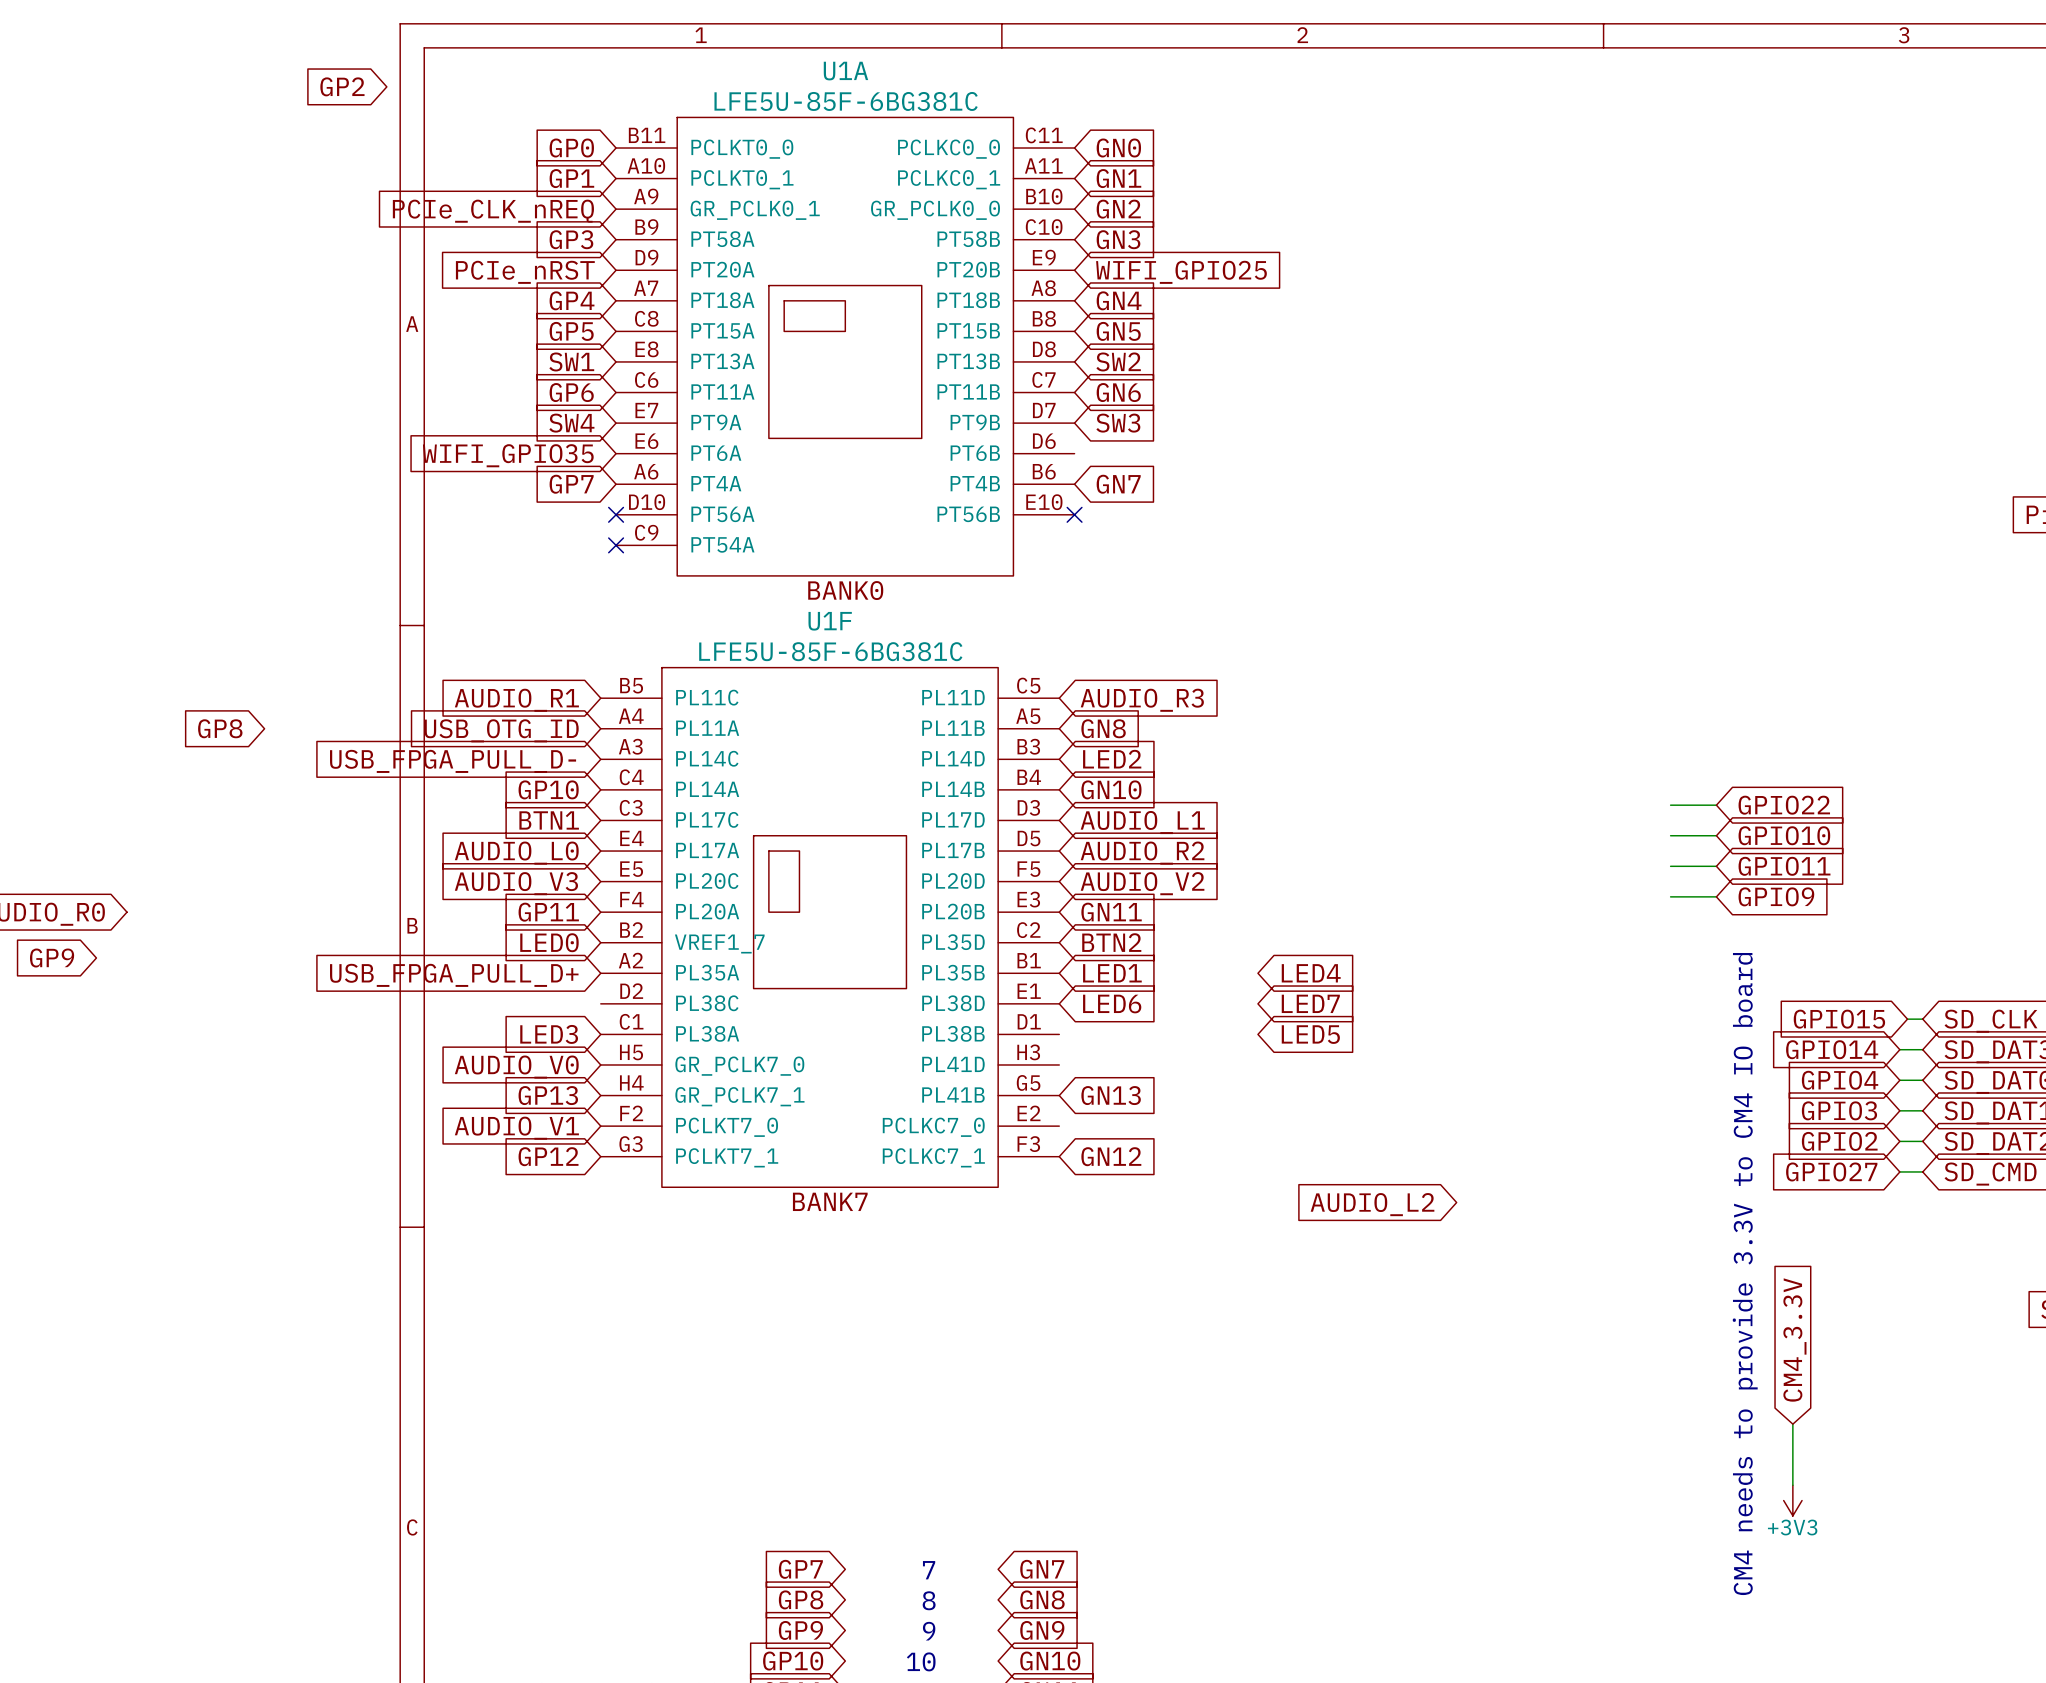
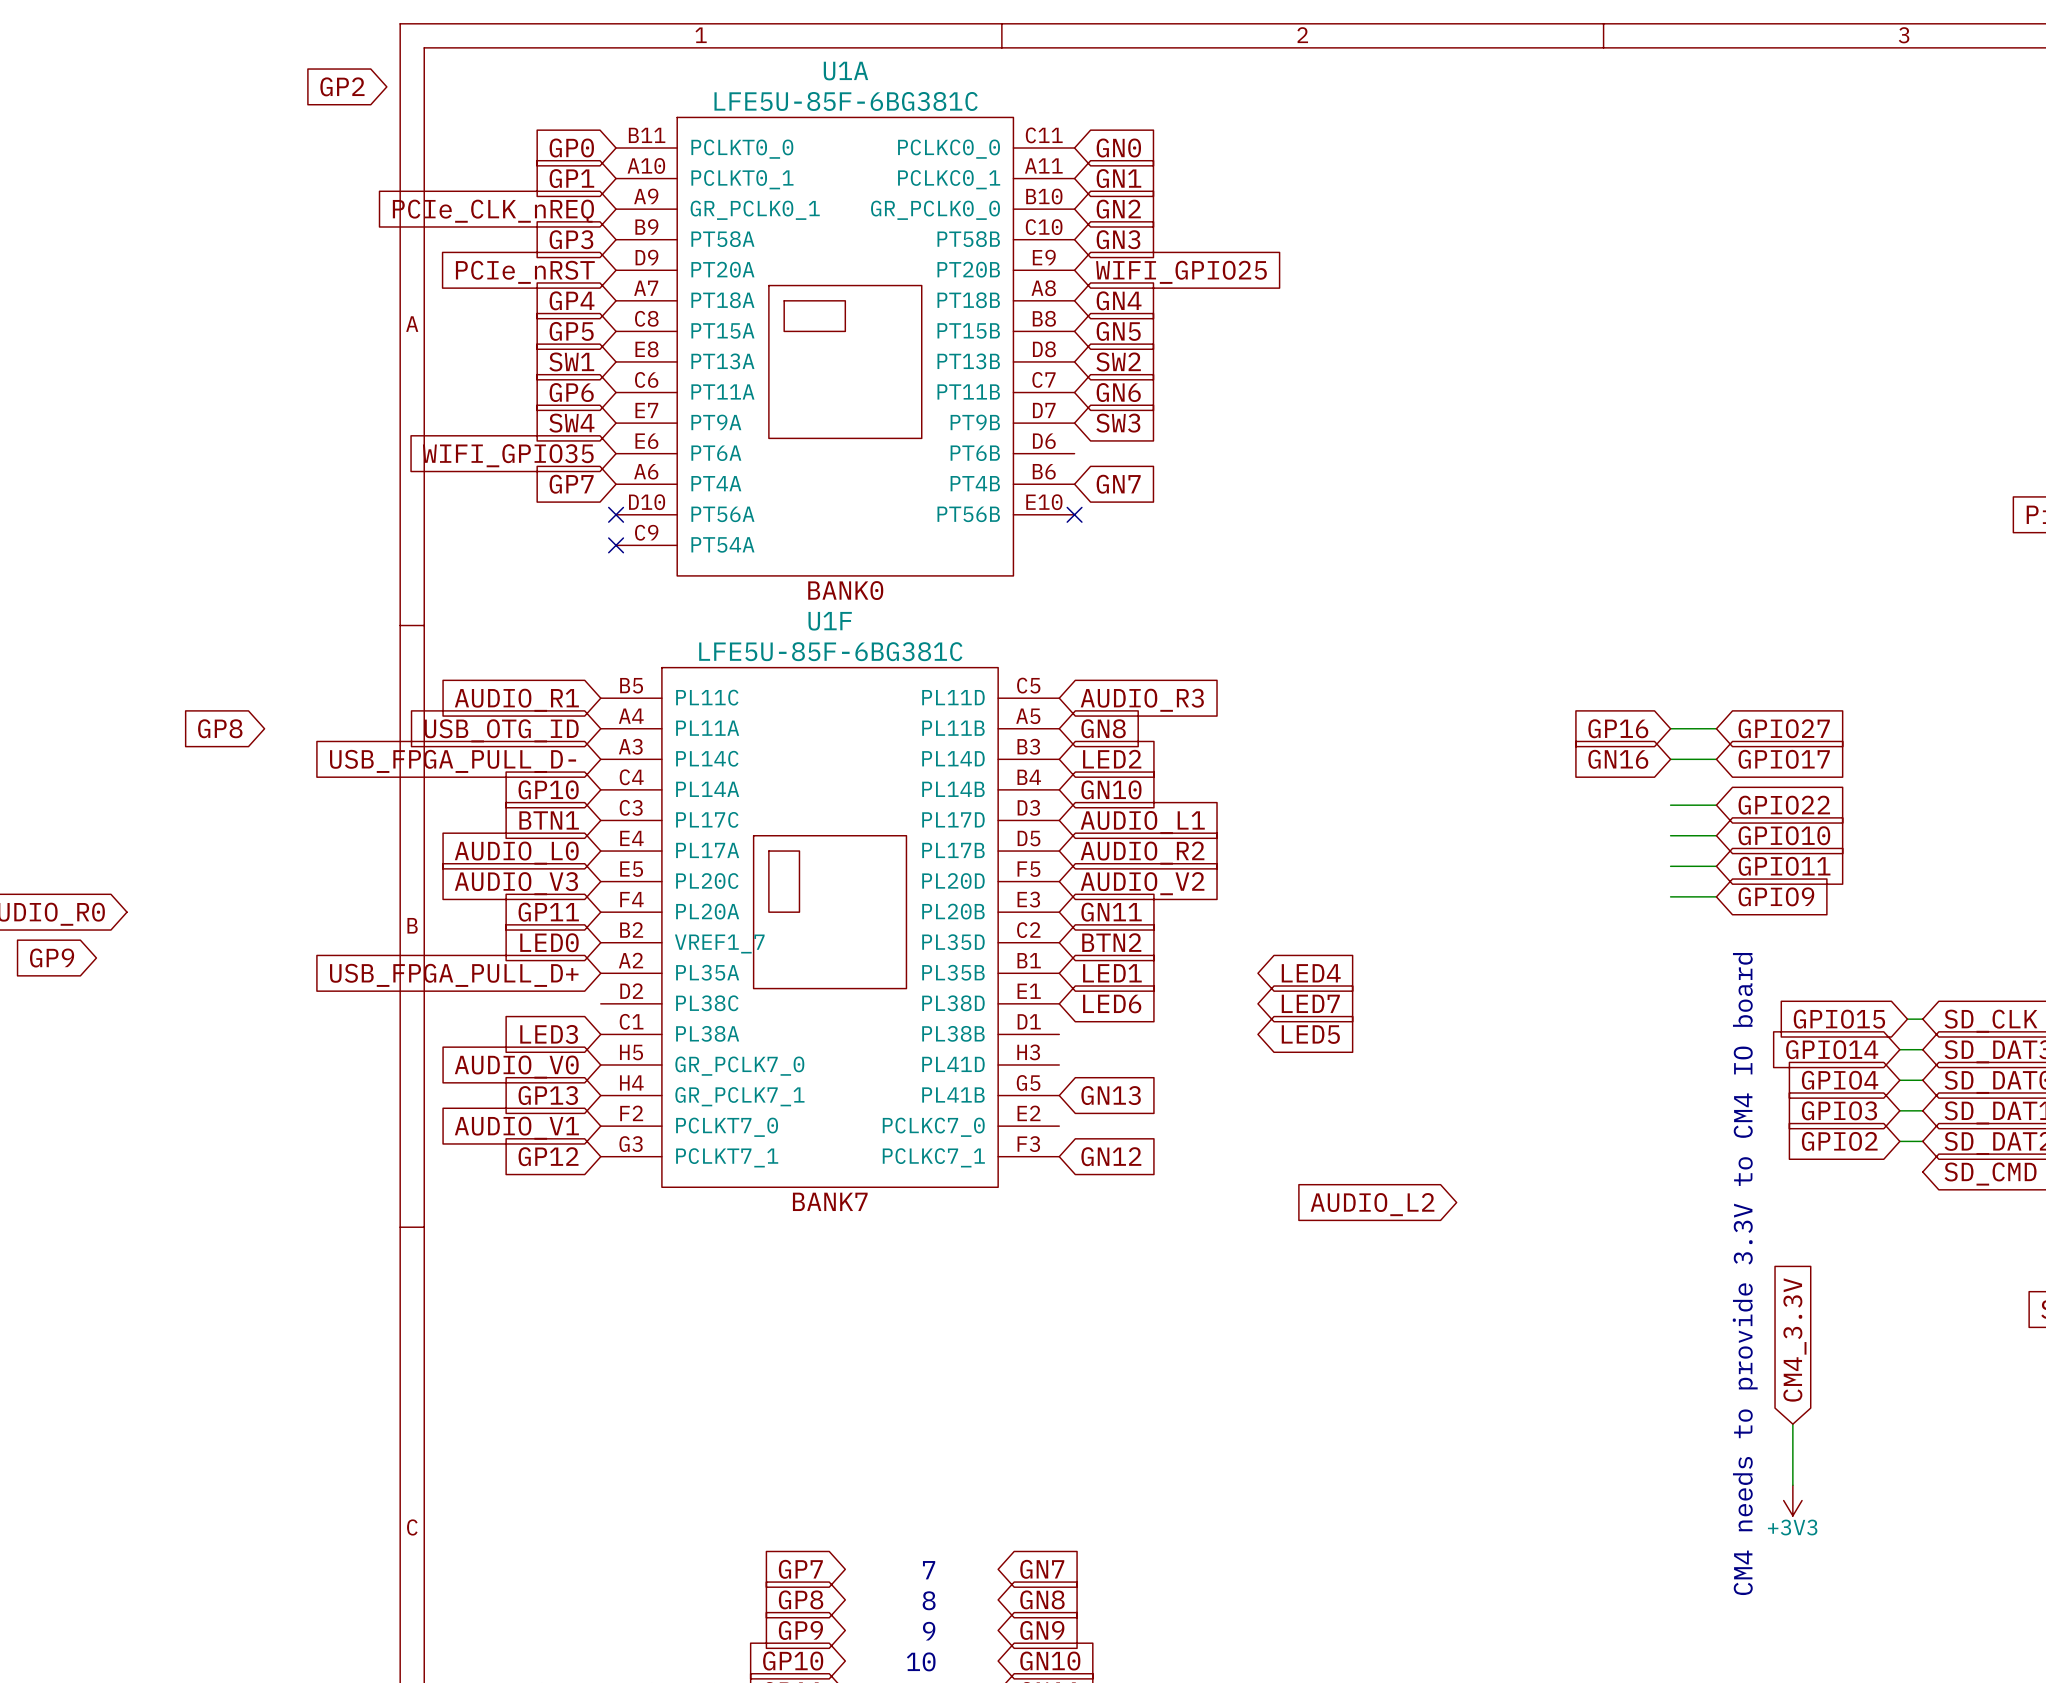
global label: none -> GP16 (1618, 728)
wire: none -> (1670, 728) (1716, 728)
global label: none -> GPIO27 (1784, 728)
global label: none -> GN16 (1618, 759)
wire: none -> (1670, 759) (1716, 759)
global label: none -> GPIO17 (1784, 759)
global label: GPIO27 (1831, 1171) -> none
wire: (1899, 1171) (1922, 1171) -> none

